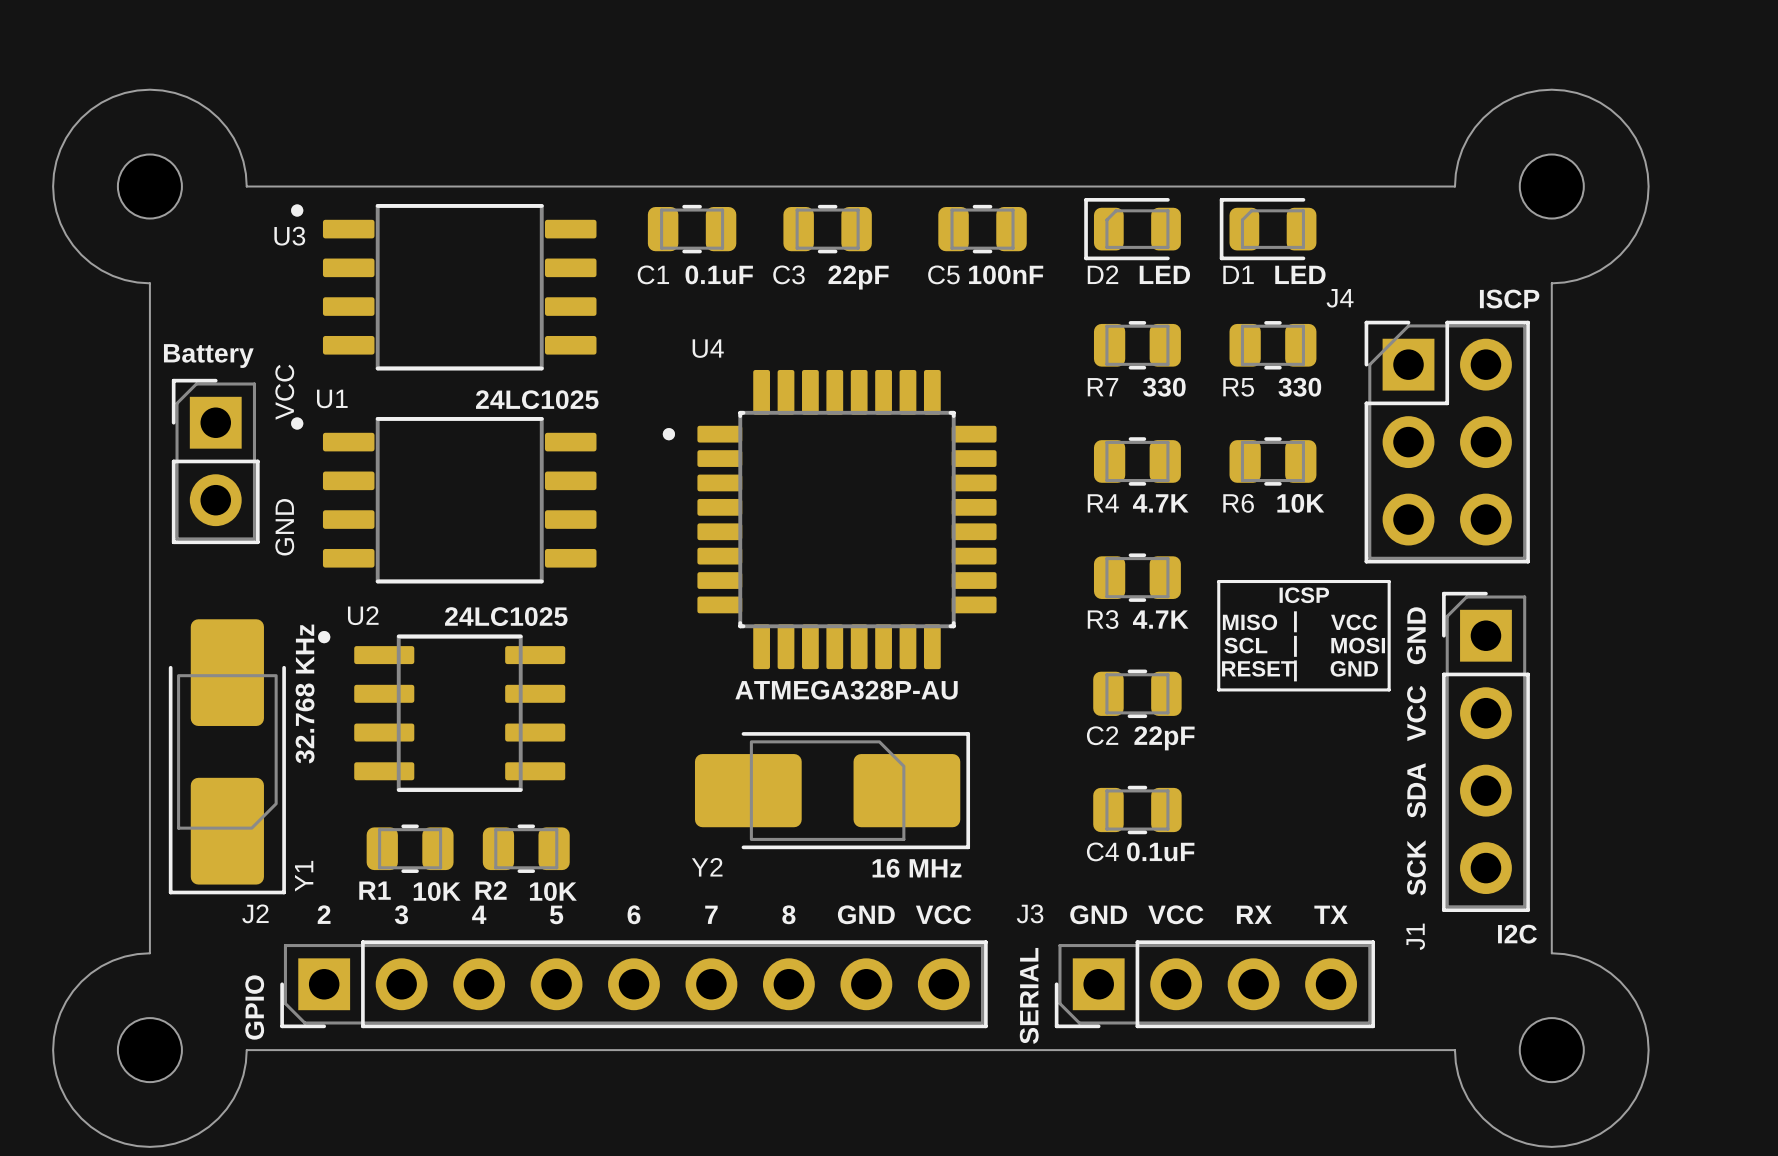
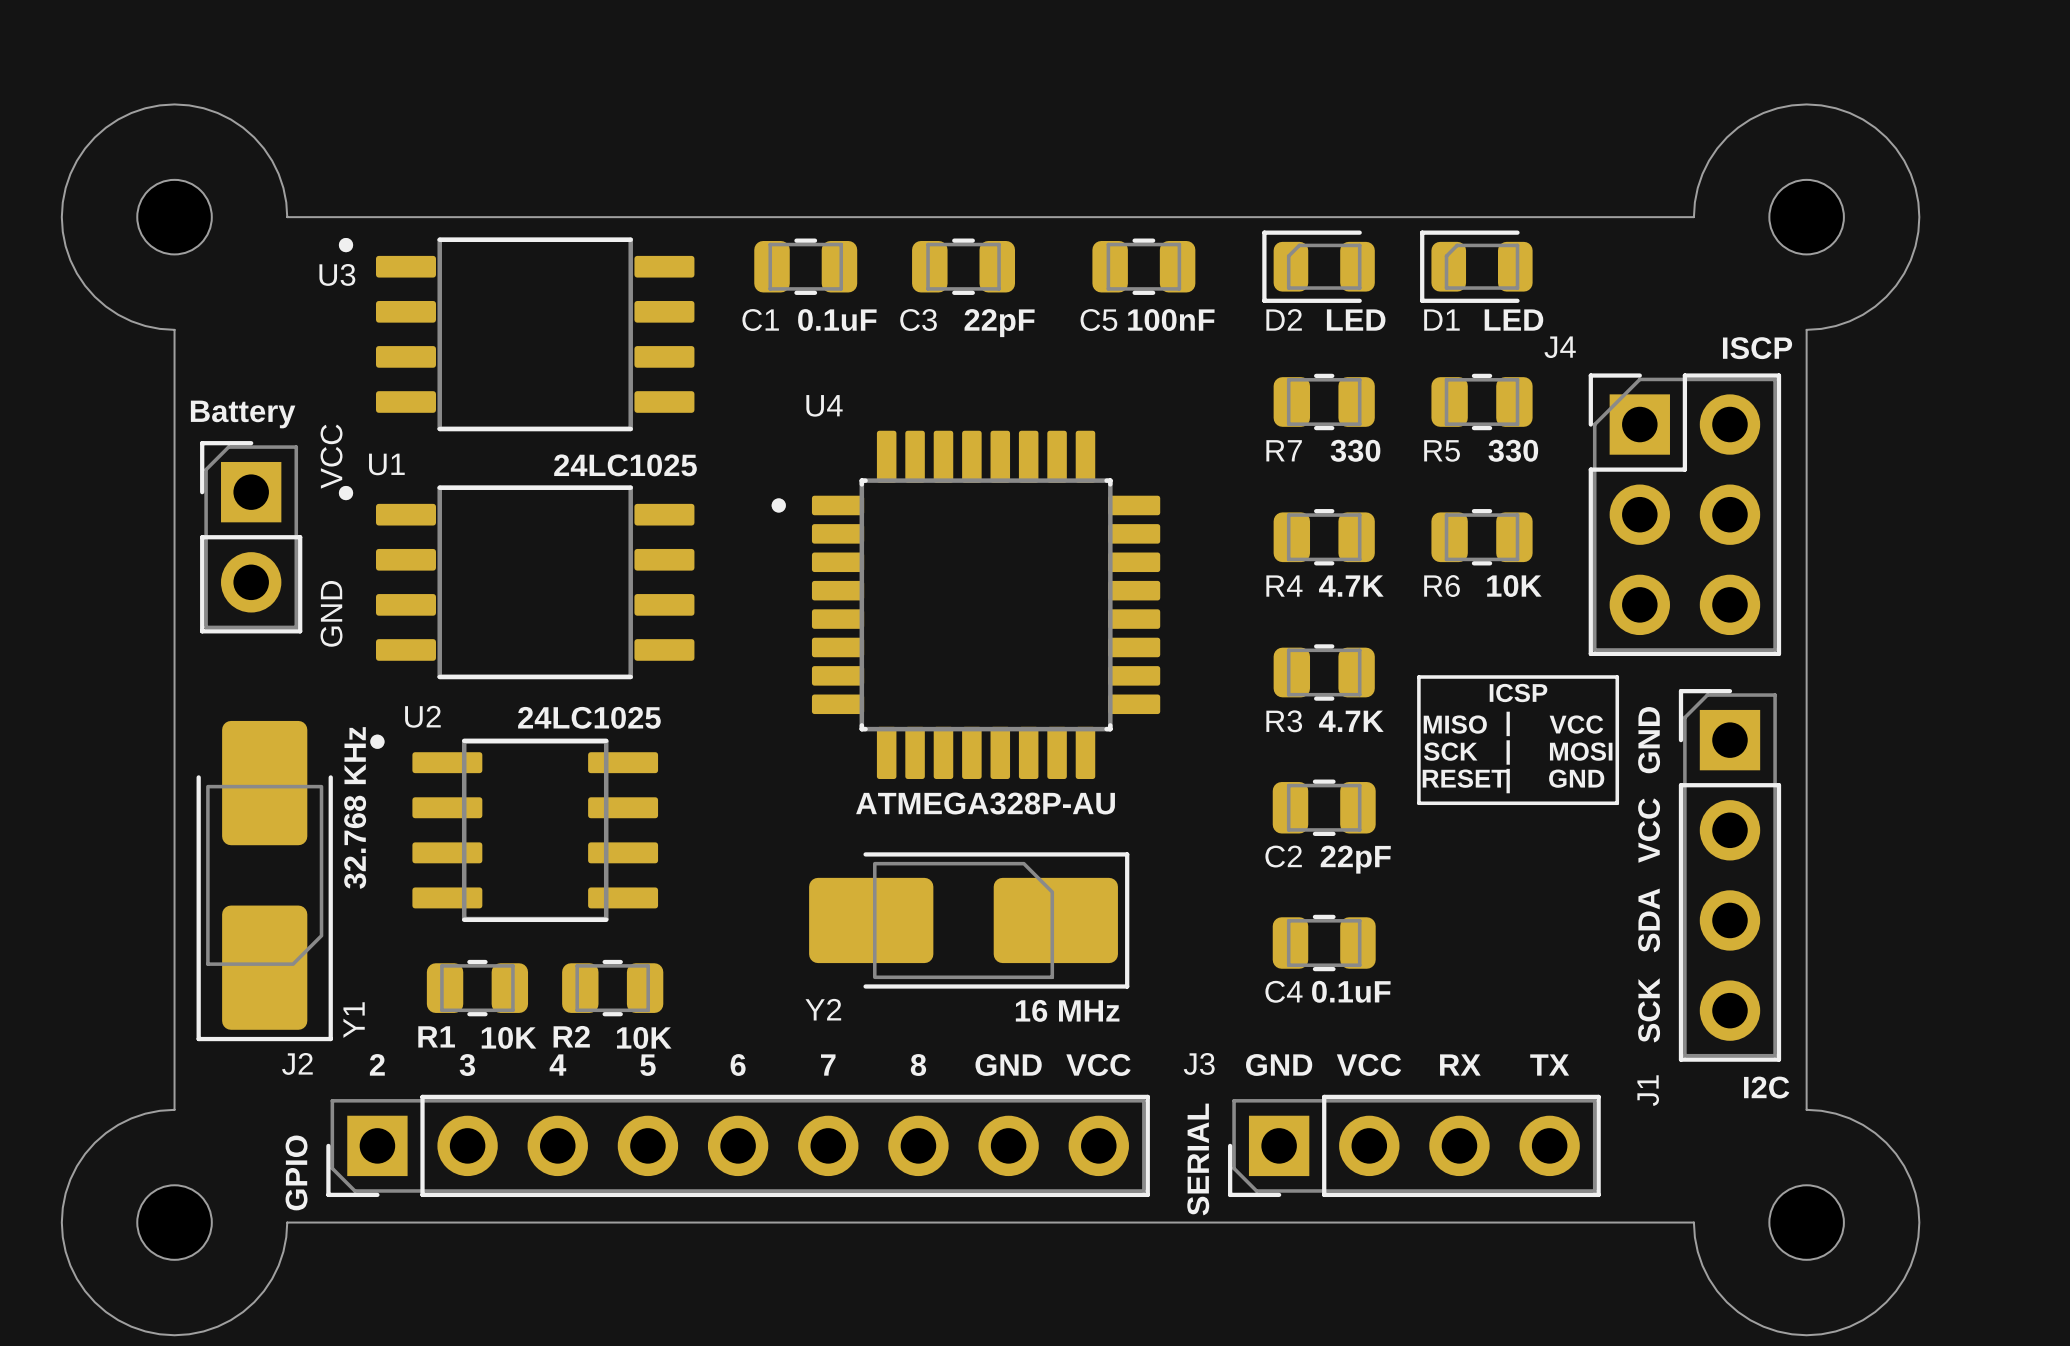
text: SCL (1245, 645) -> SCK (1450, 751)

